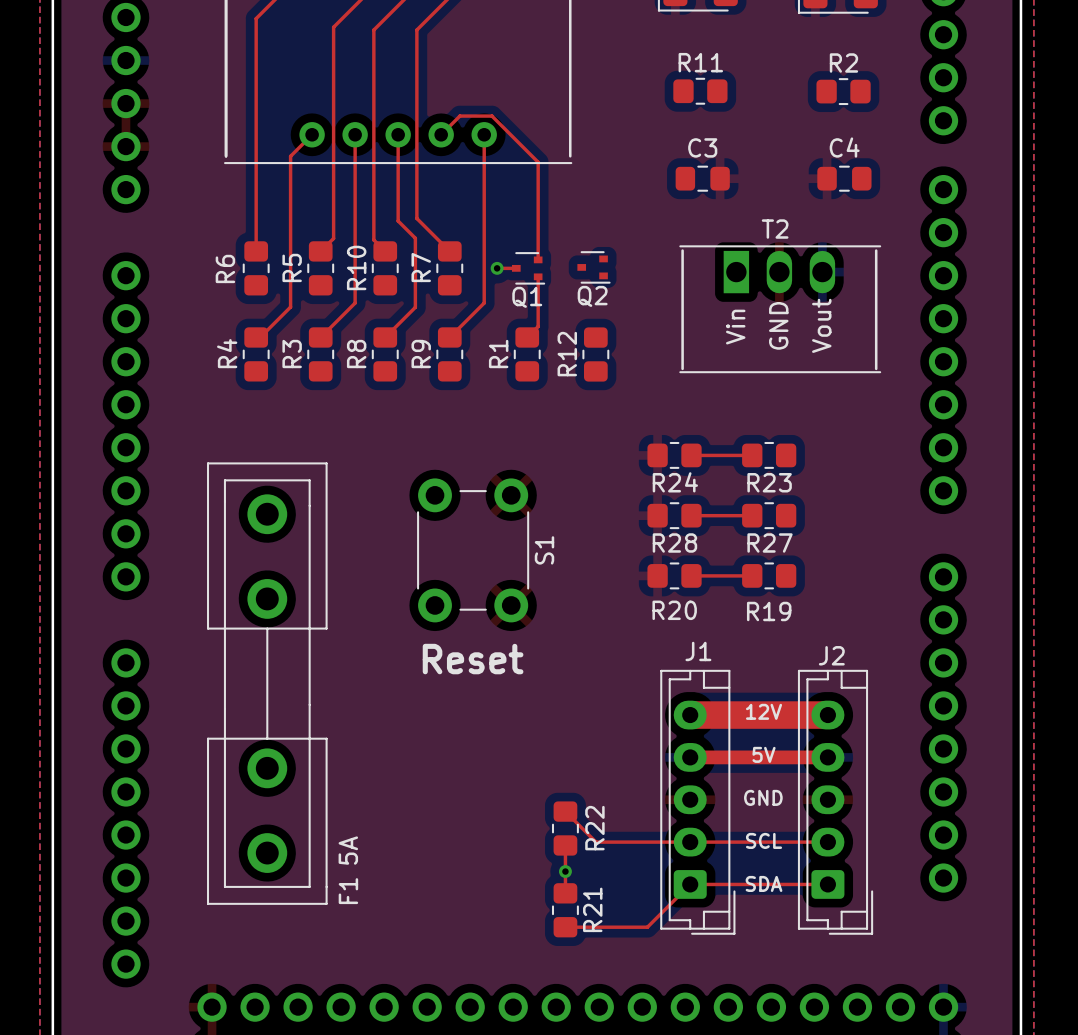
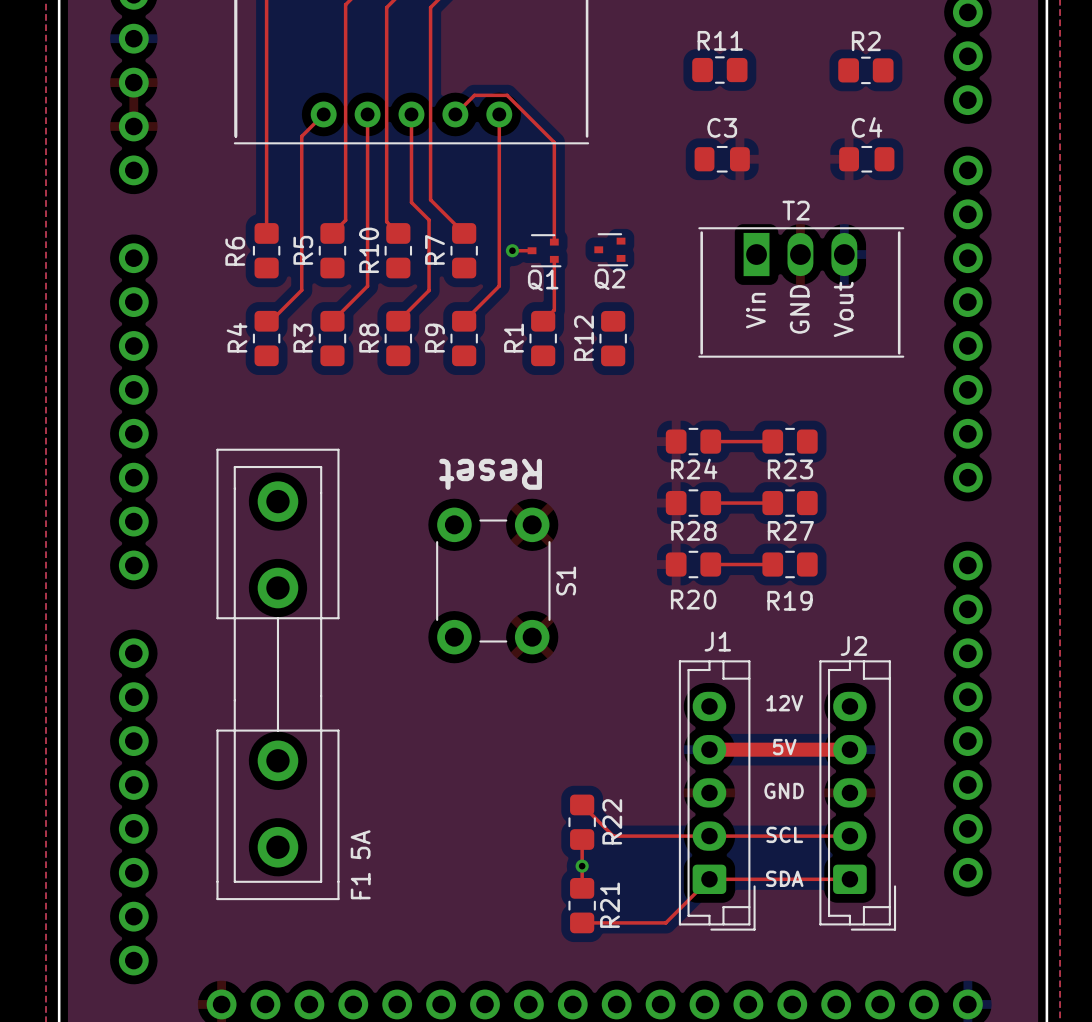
S1 position: (473, 550) -> (493, 581)
text rotation: 0° (473, 659) -> 180° (490, 474)
text position: Reset (473, 659) -> Reset (490, 474)
top track: (690, 715) (827, 715) -> none

